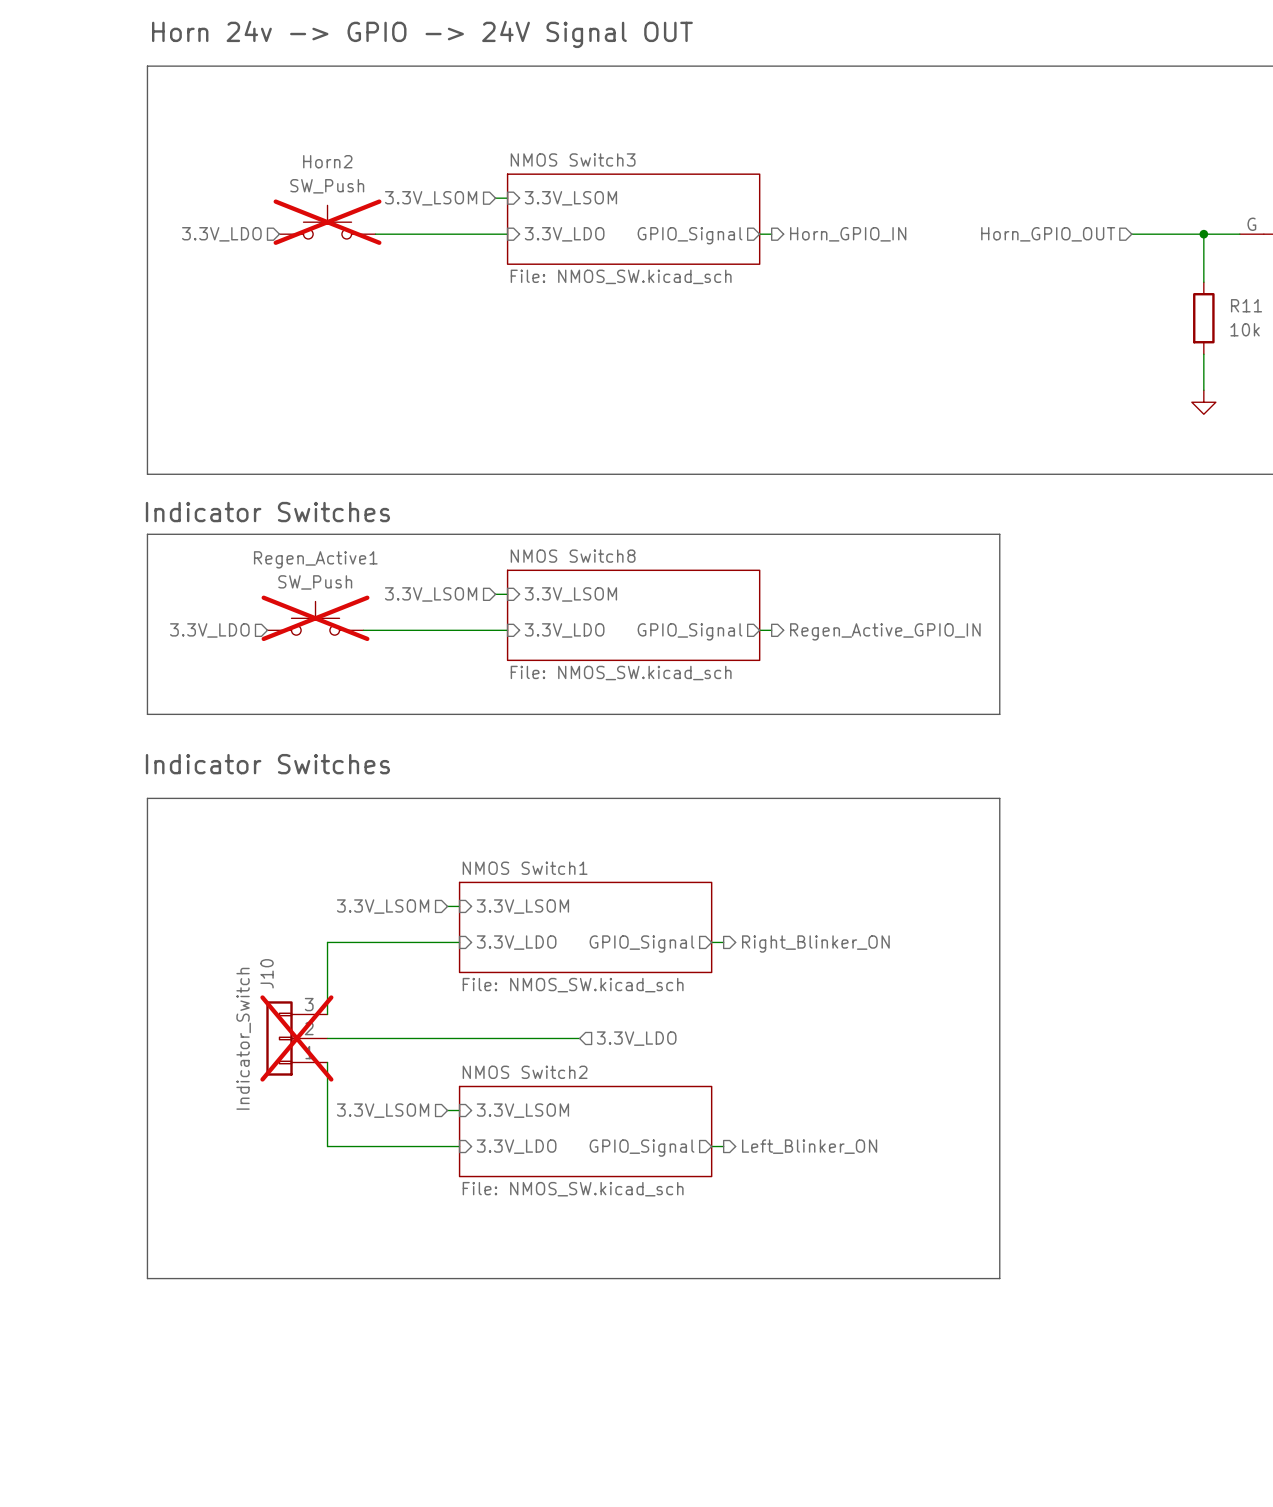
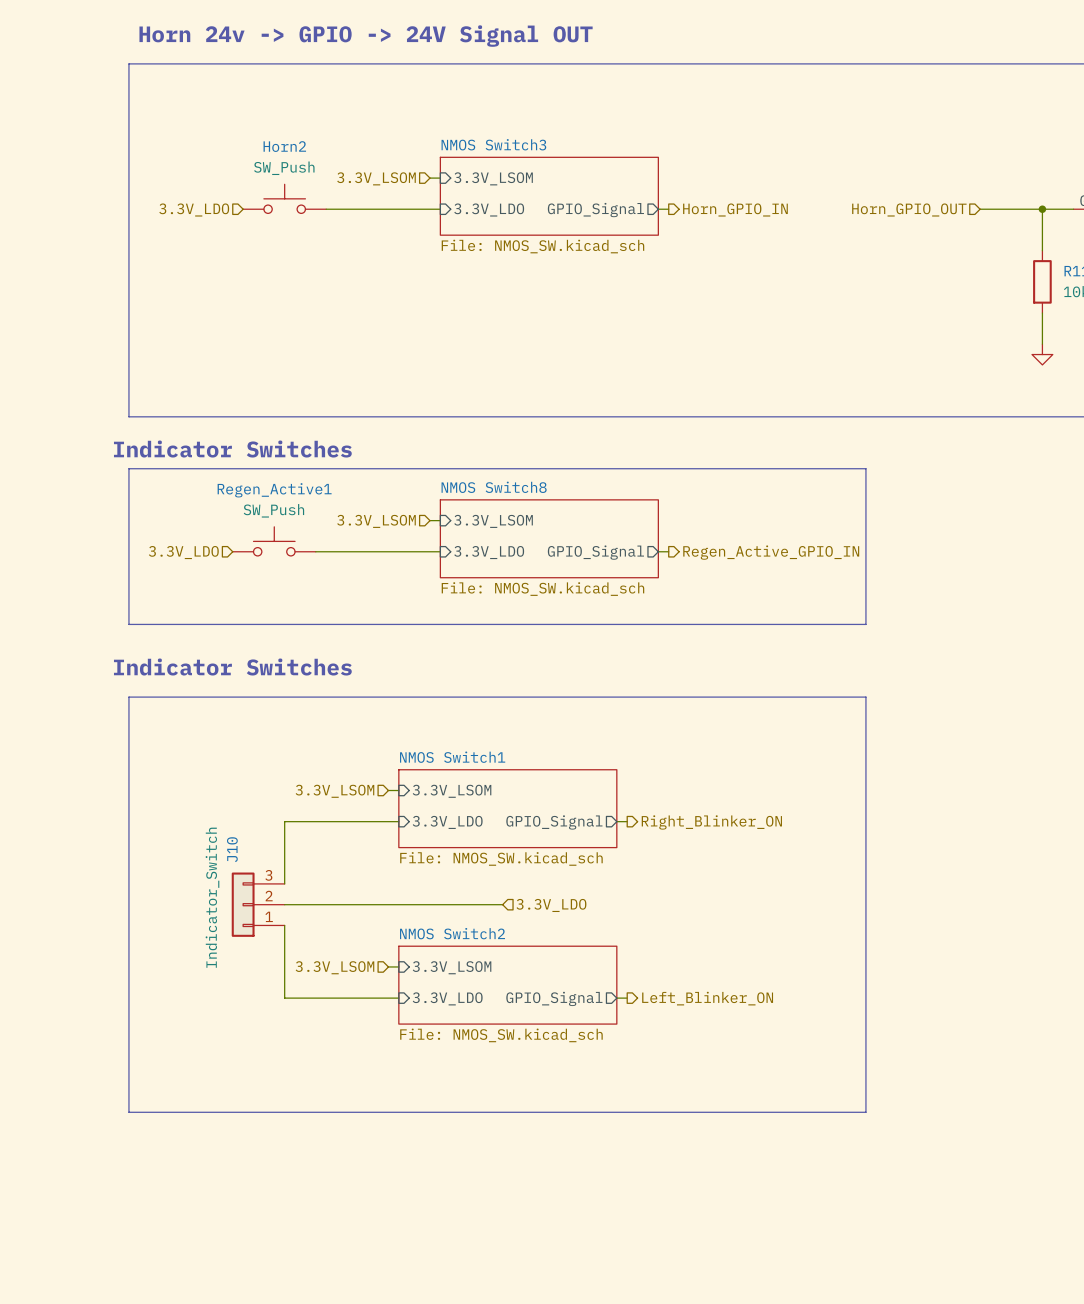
Horn2 do-not-place cross: (327, 222) -> none
Regen_Active1 do-not-place cross: (315, 618) -> none
J10 do-not-place cross: (296, 1038) -> none

